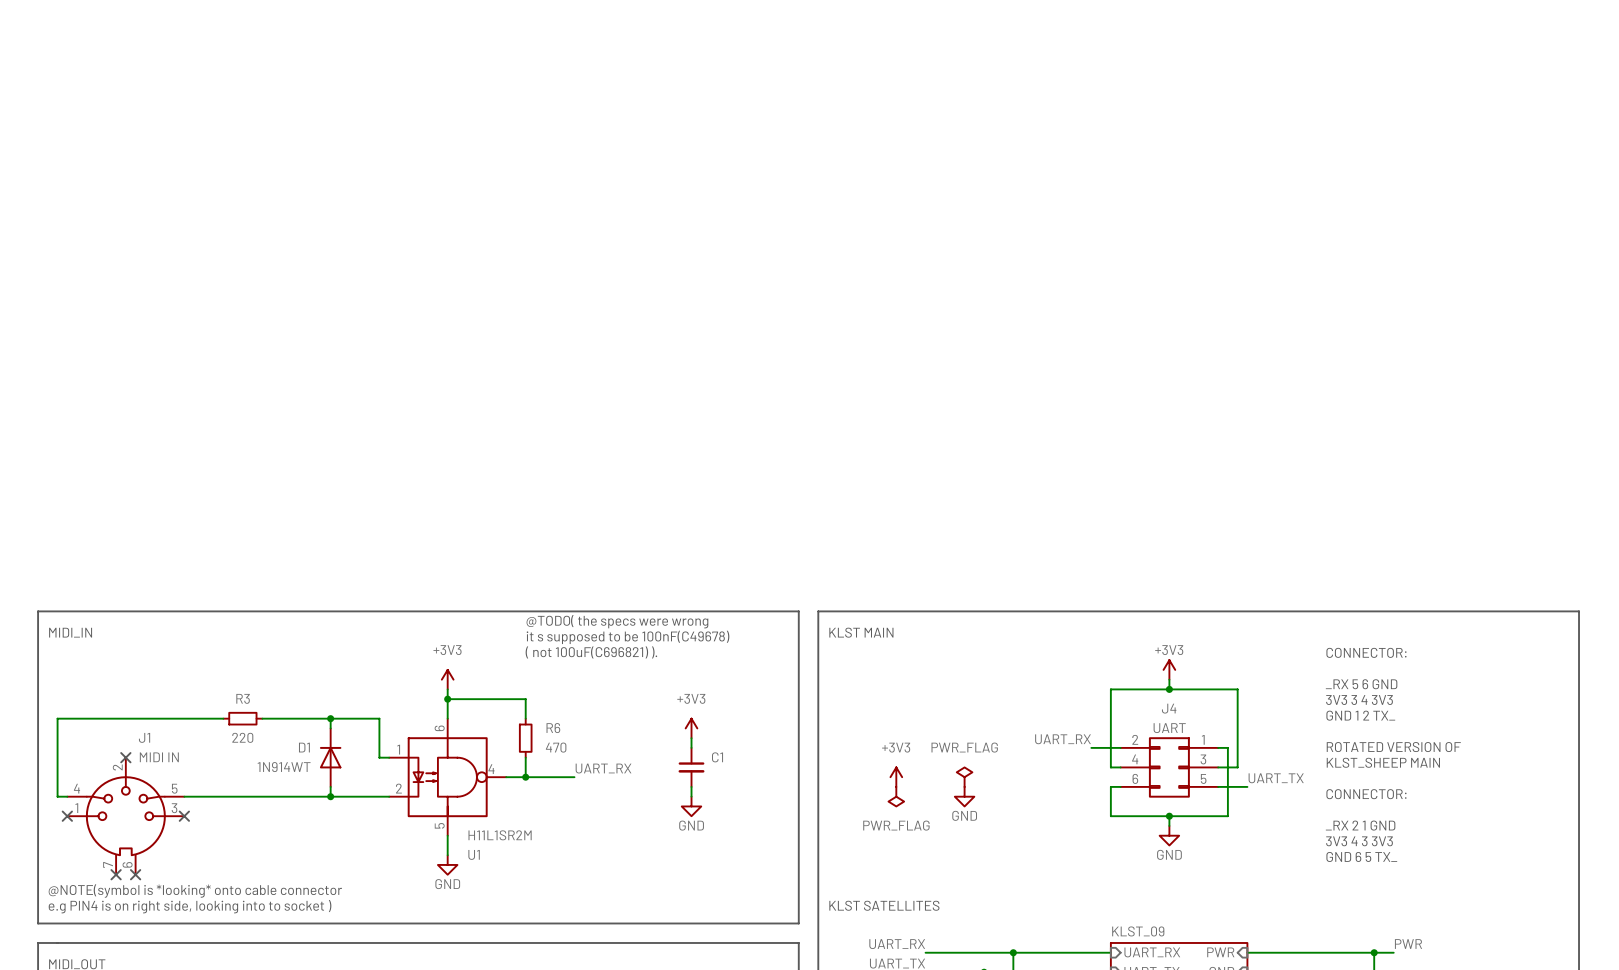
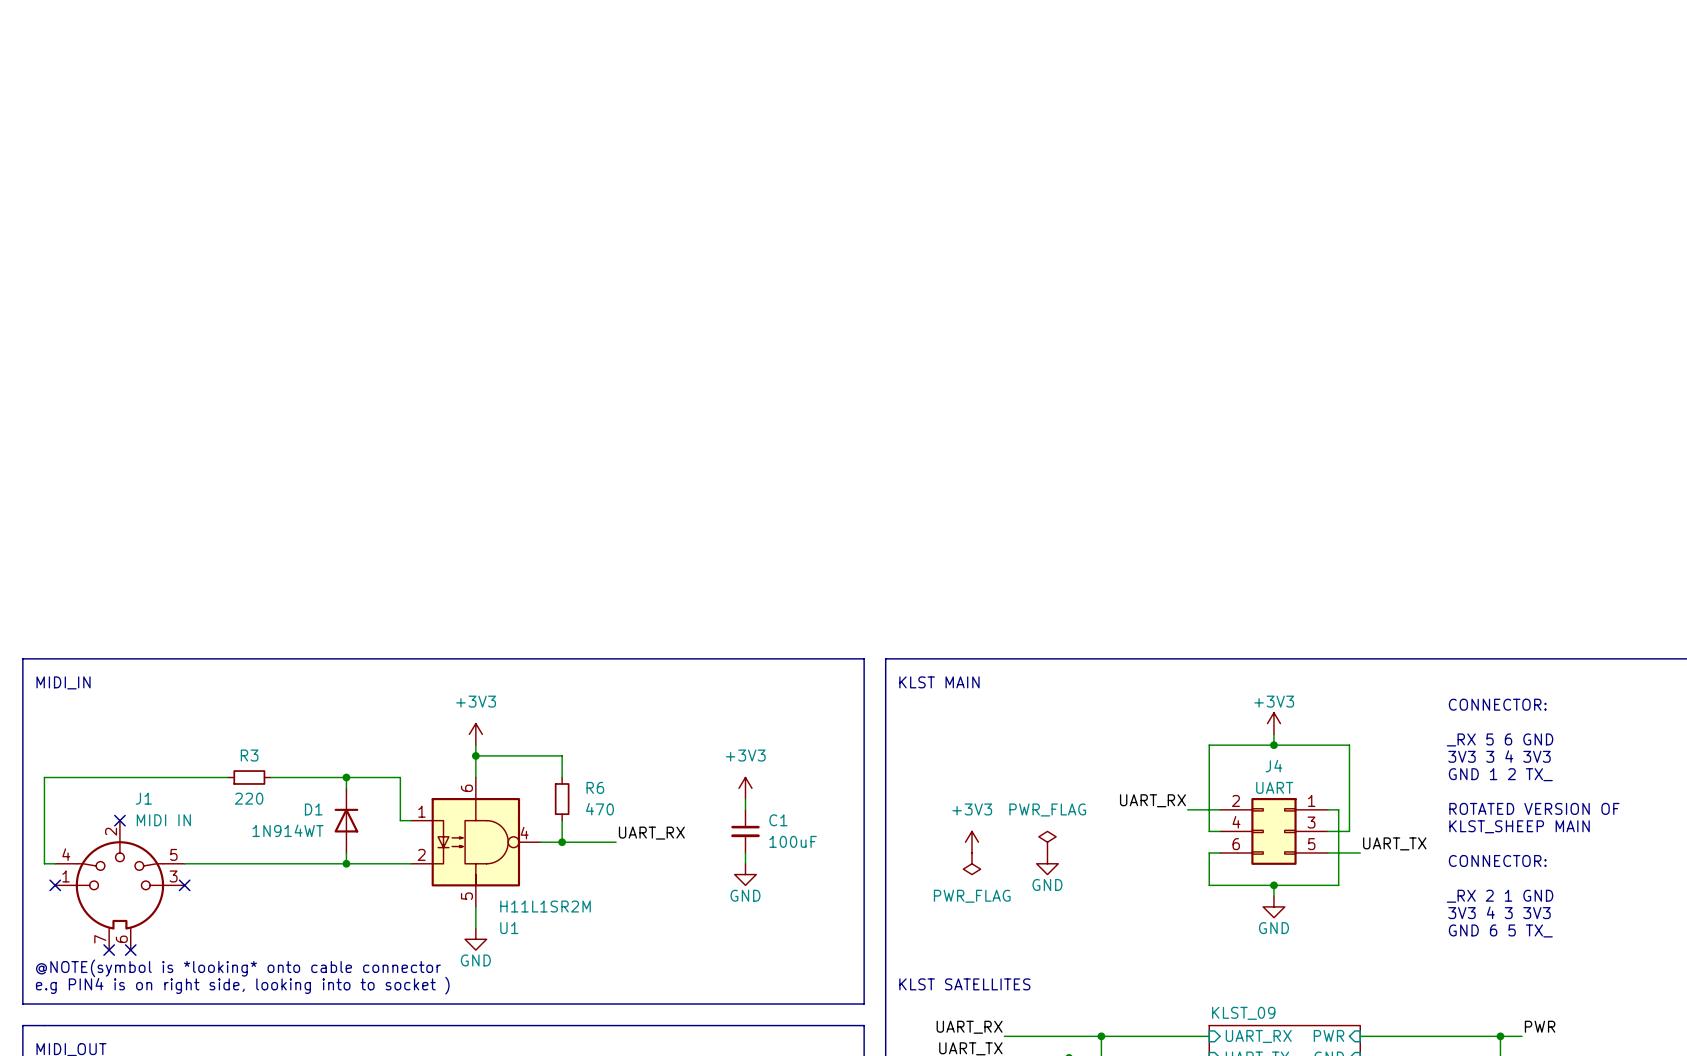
text: @TODO( the specs were wrong (617, 621) -> none
text: it s supposed to be 100nF(C49678) (628, 637) -> none
text: ( not 100uF(C696821) ). (591, 652) -> none
C1 value: none -> 100uF (793, 841)

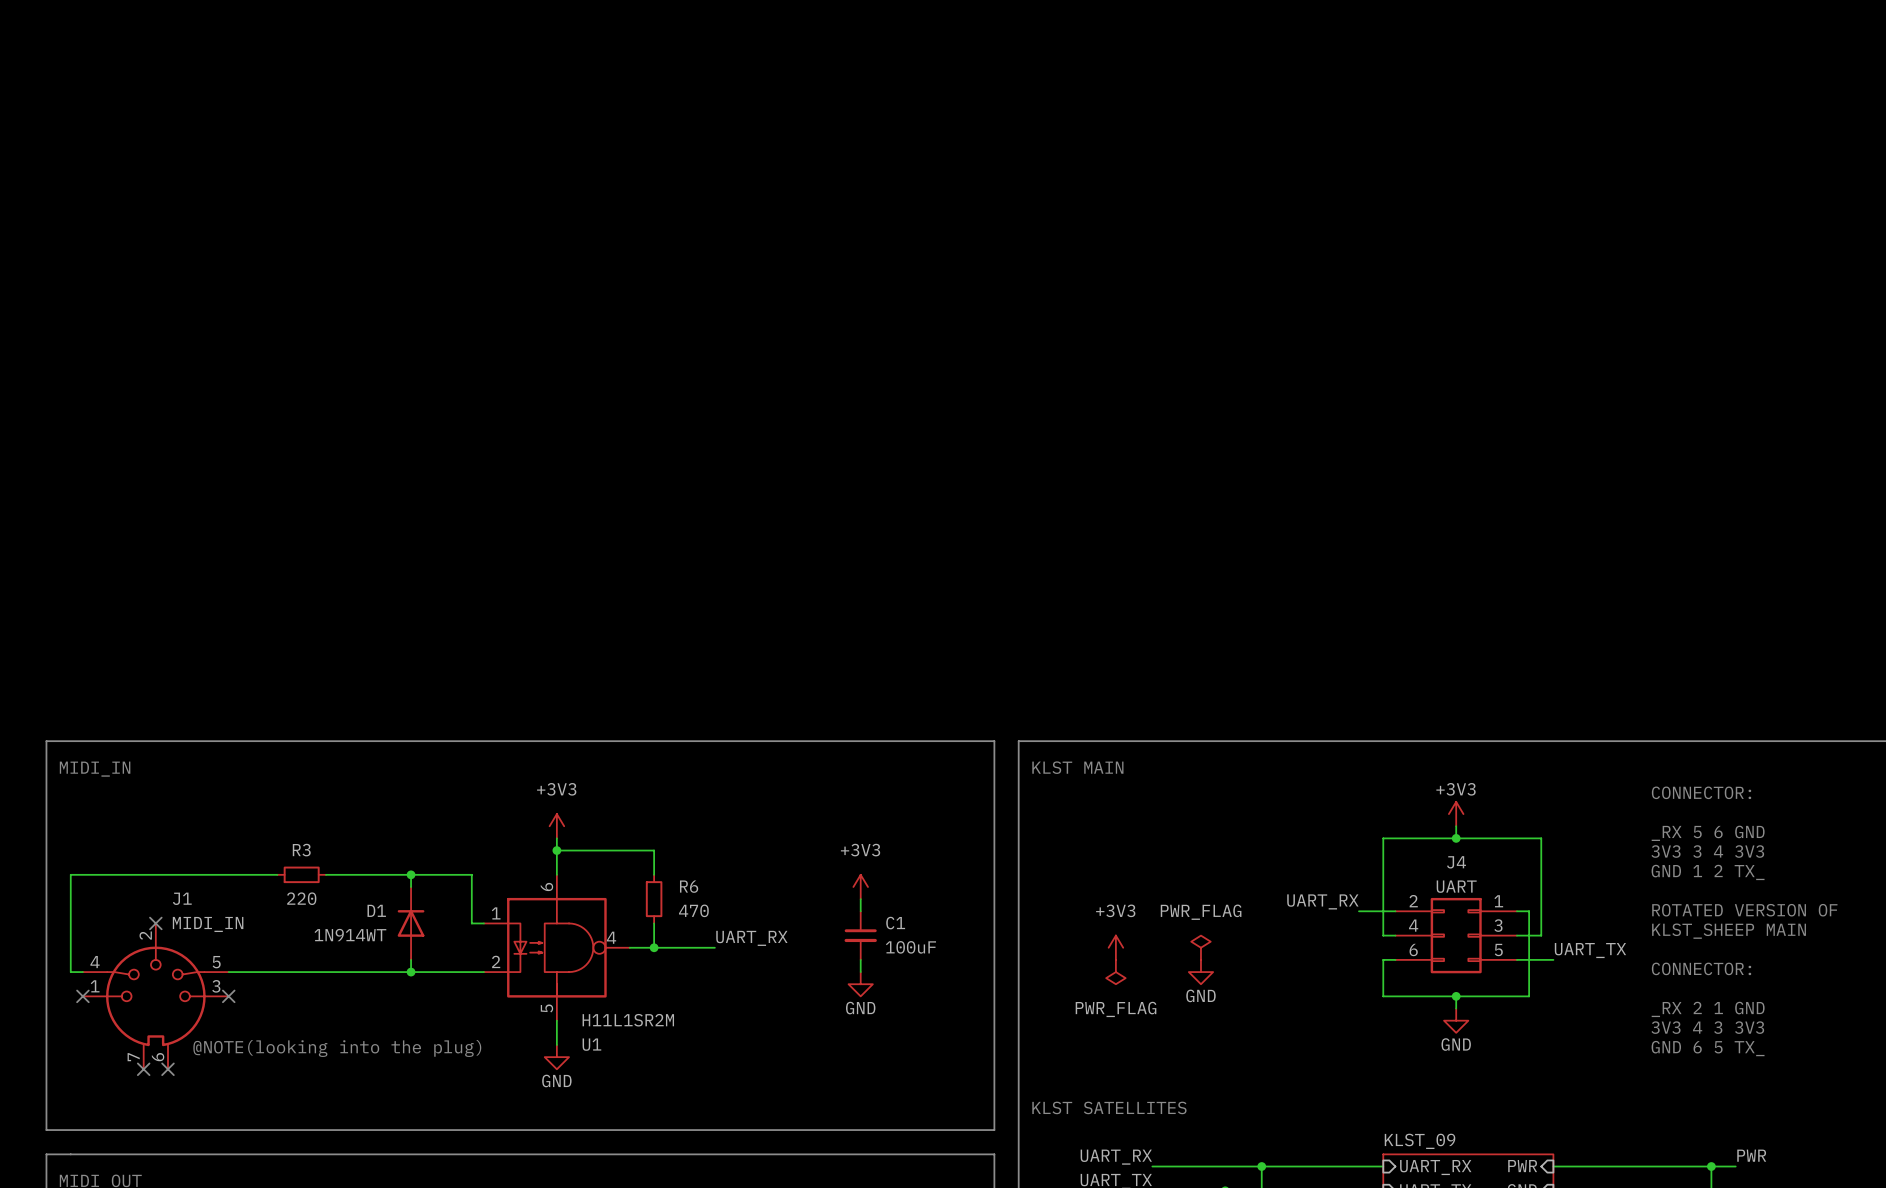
J1 value: MIDI IN (163, 820) -> MIDI_IN (208, 924)
text: none -> @NOTE(looking into the plug) (337, 1048)
text: @NOTE(symbol is *looking* onto cable connector (238, 968) -> none
text: e.g PIN4 is on right side, looking into to socket ) (242, 985) -> none

